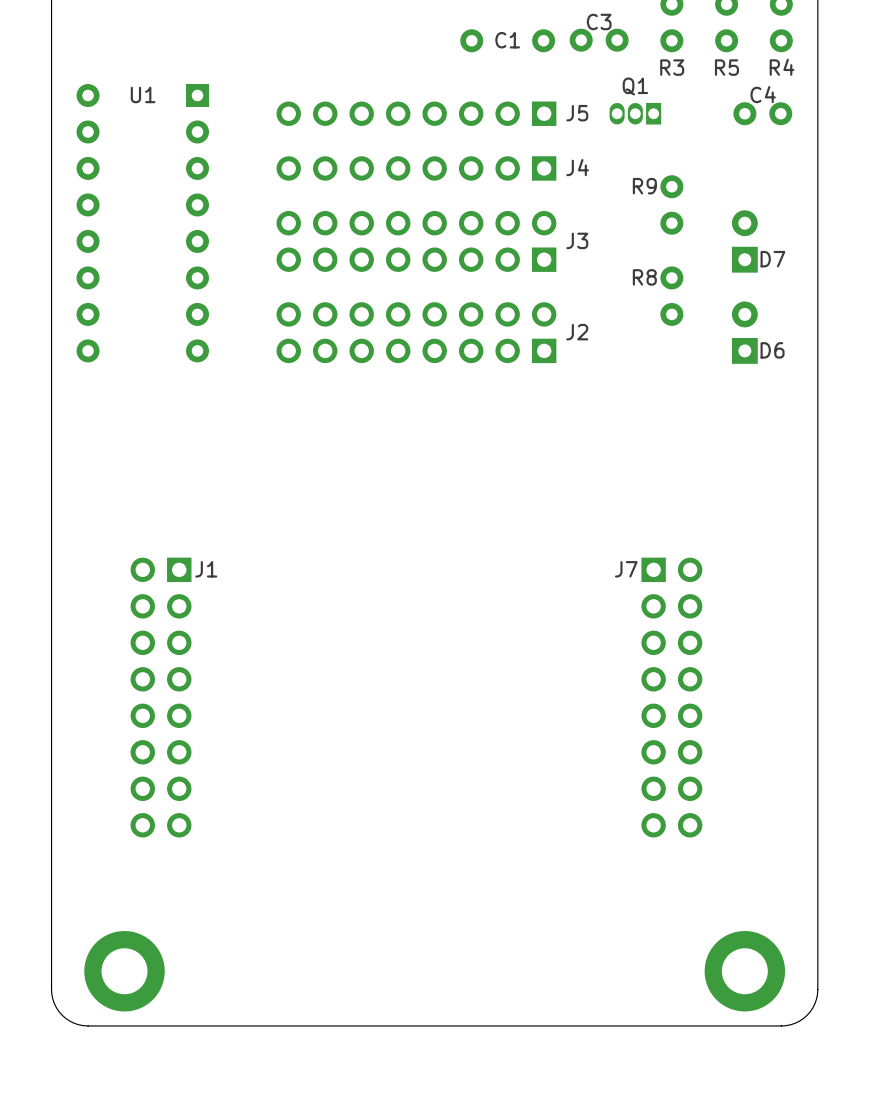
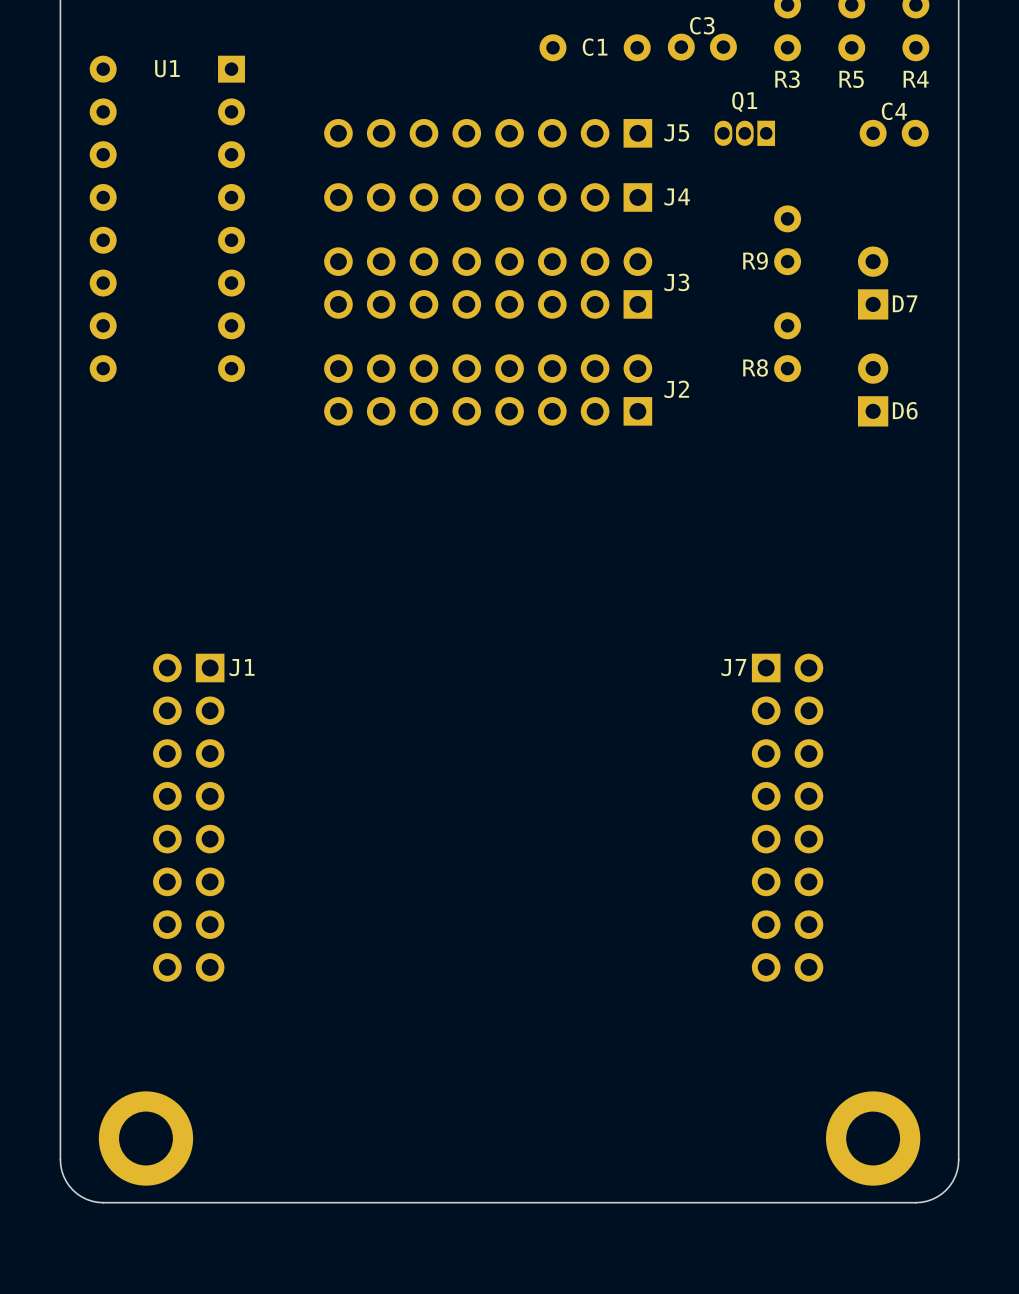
R9 name position: R9 (644, 186) -> R9 (755, 261)
U1 position: (142, 223) -> (167, 218)
R8 name position: R8 (644, 277) -> R8 (755, 367)

